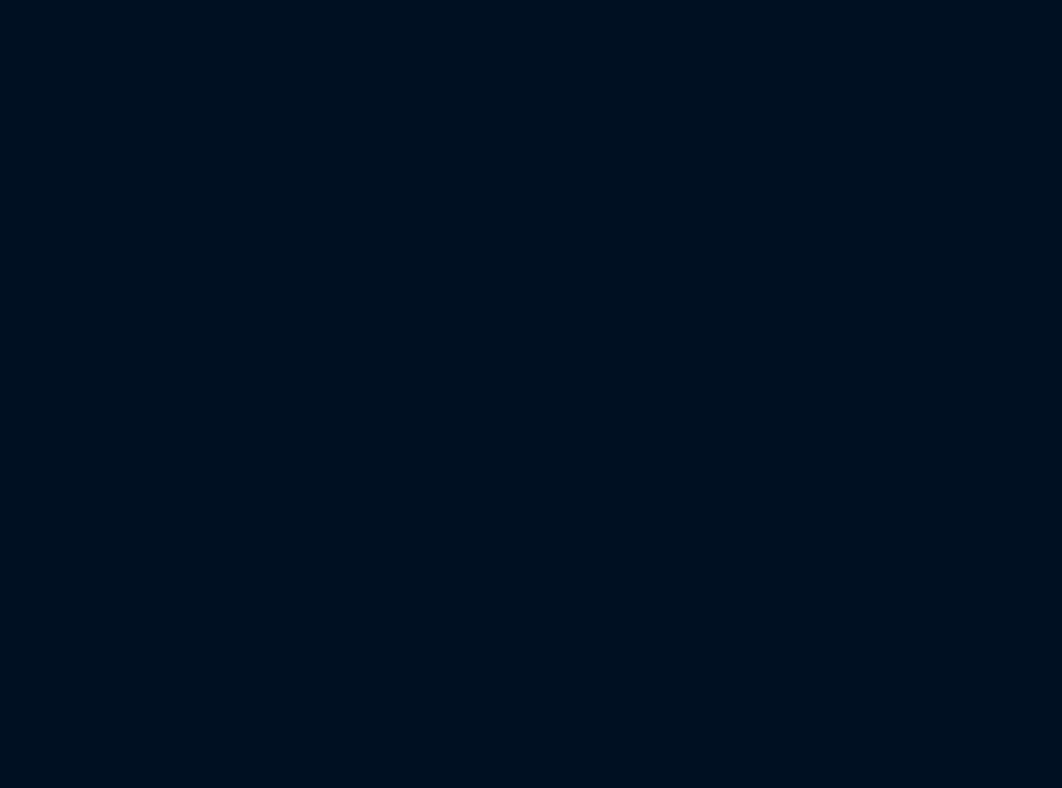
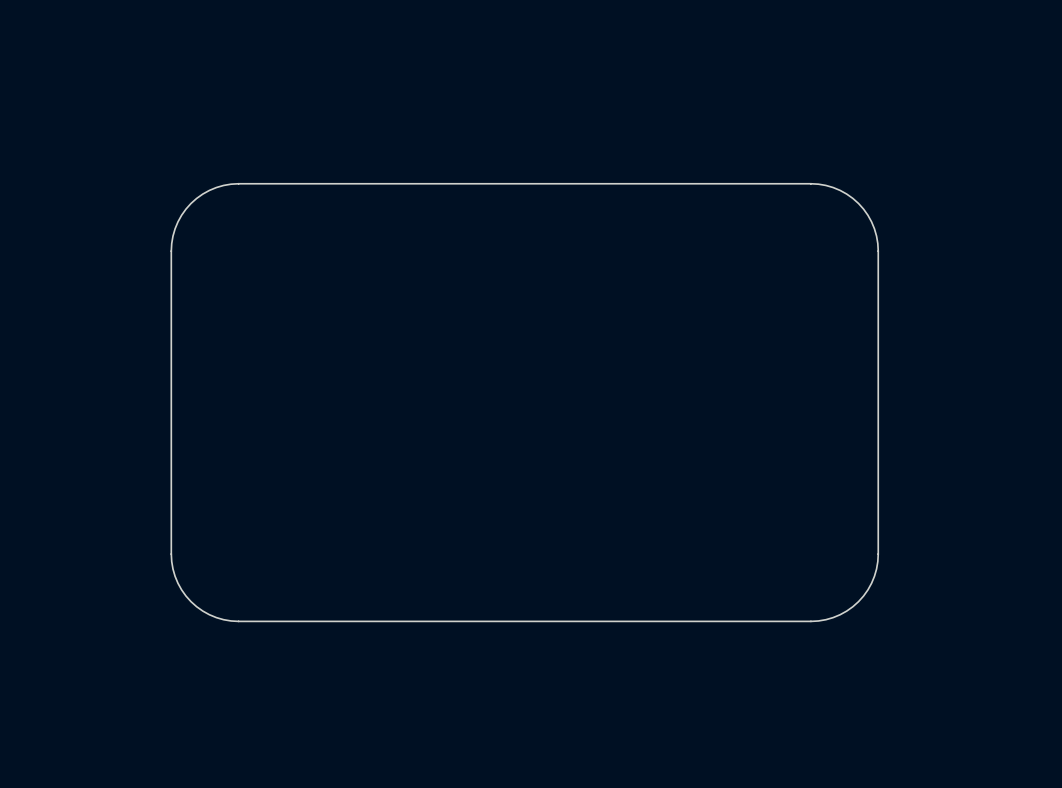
board edge: none -> (810, 183) (238, 183) (223, 185) (202, 194) (191, 203) (181, 215) (175, 228) (171, 251) (171, 554) (175, 576) (181, 589) (191, 601) (209, 614) (223, 619) (238, 621) (810, 621) (833, 617) (846, 611) (858, 601) (867, 589) (874, 576) (877, 561) (877, 243) (871, 221) (858, 203) (840, 190) (825, 185) (810, 183)

